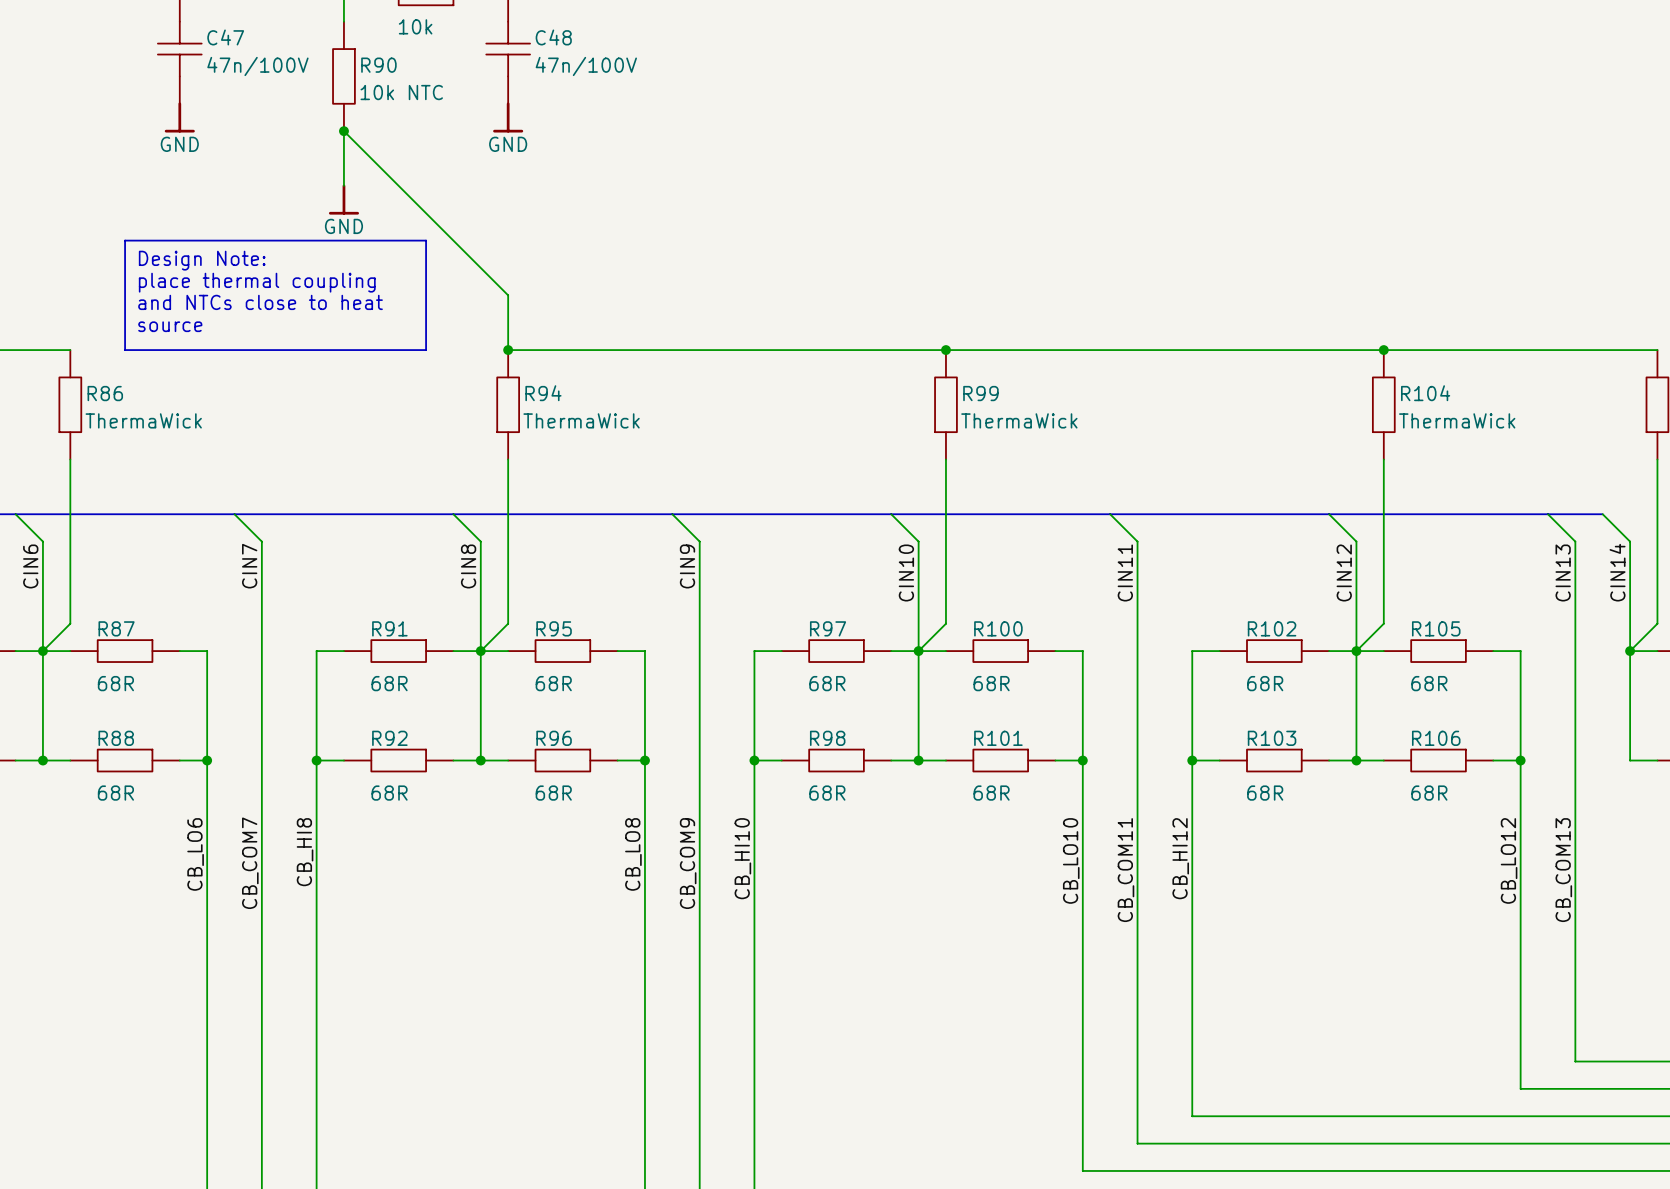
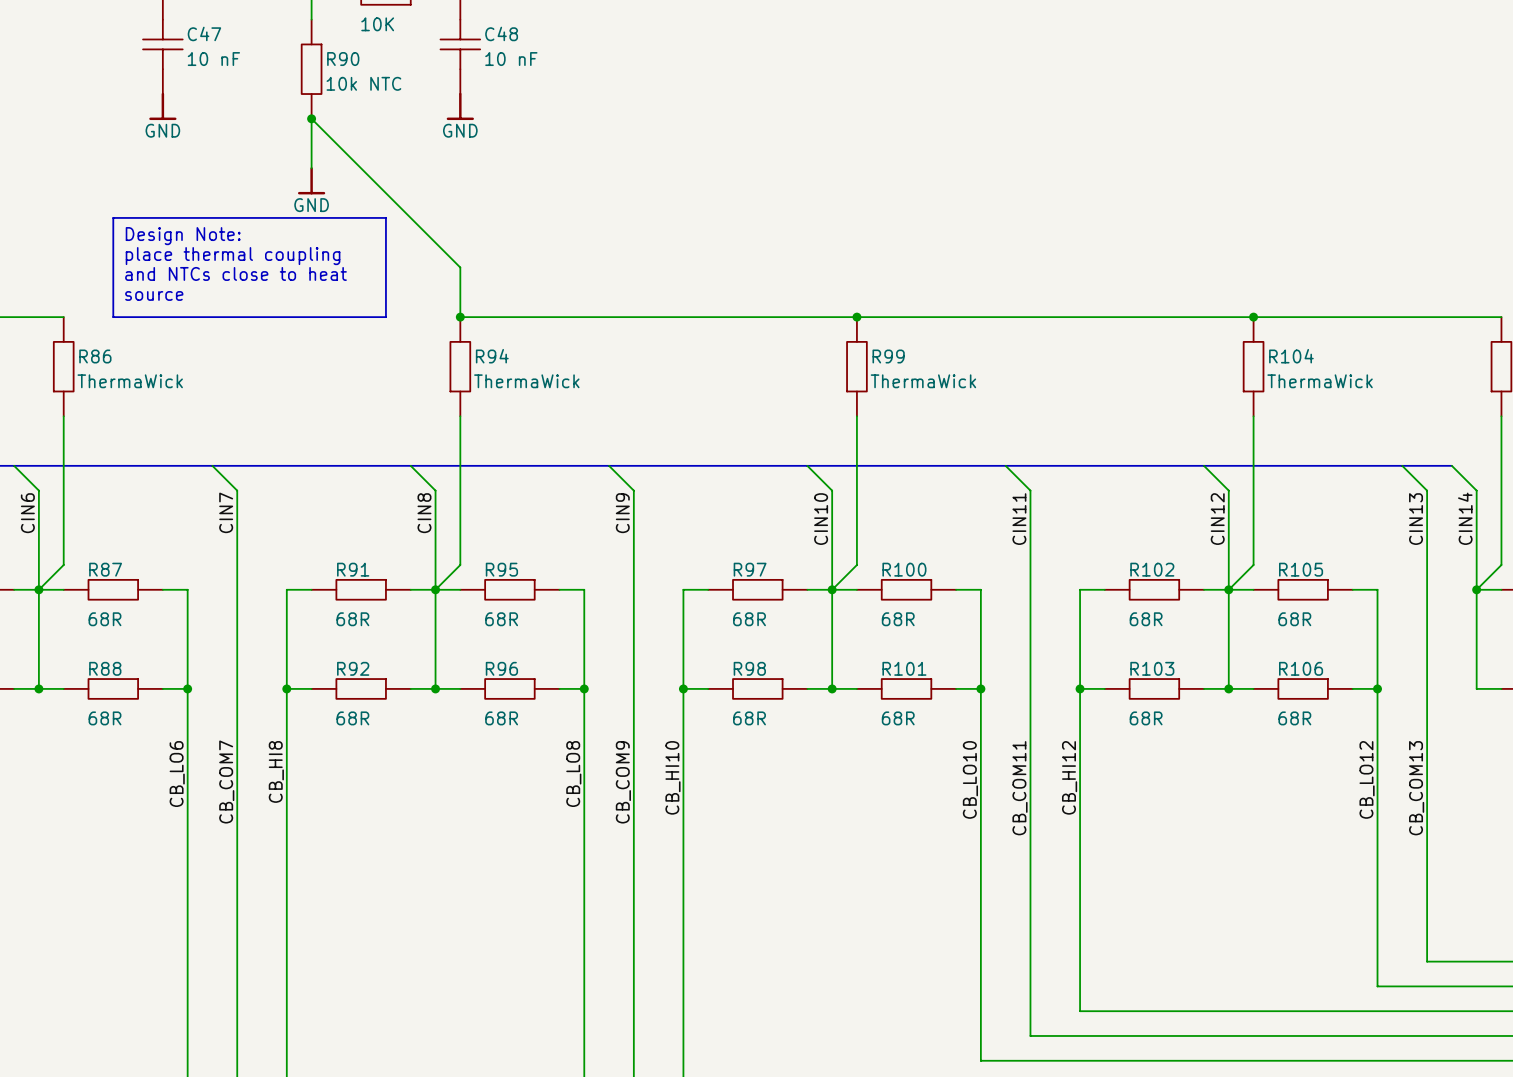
part value: 10k (415, 26) -> 10K (377, 24)
C47 value: 47n/100V (257, 66) -> 10 nF (213, 59)
C48 value: 47n/100V (586, 66) -> 10 nF (511, 59)

